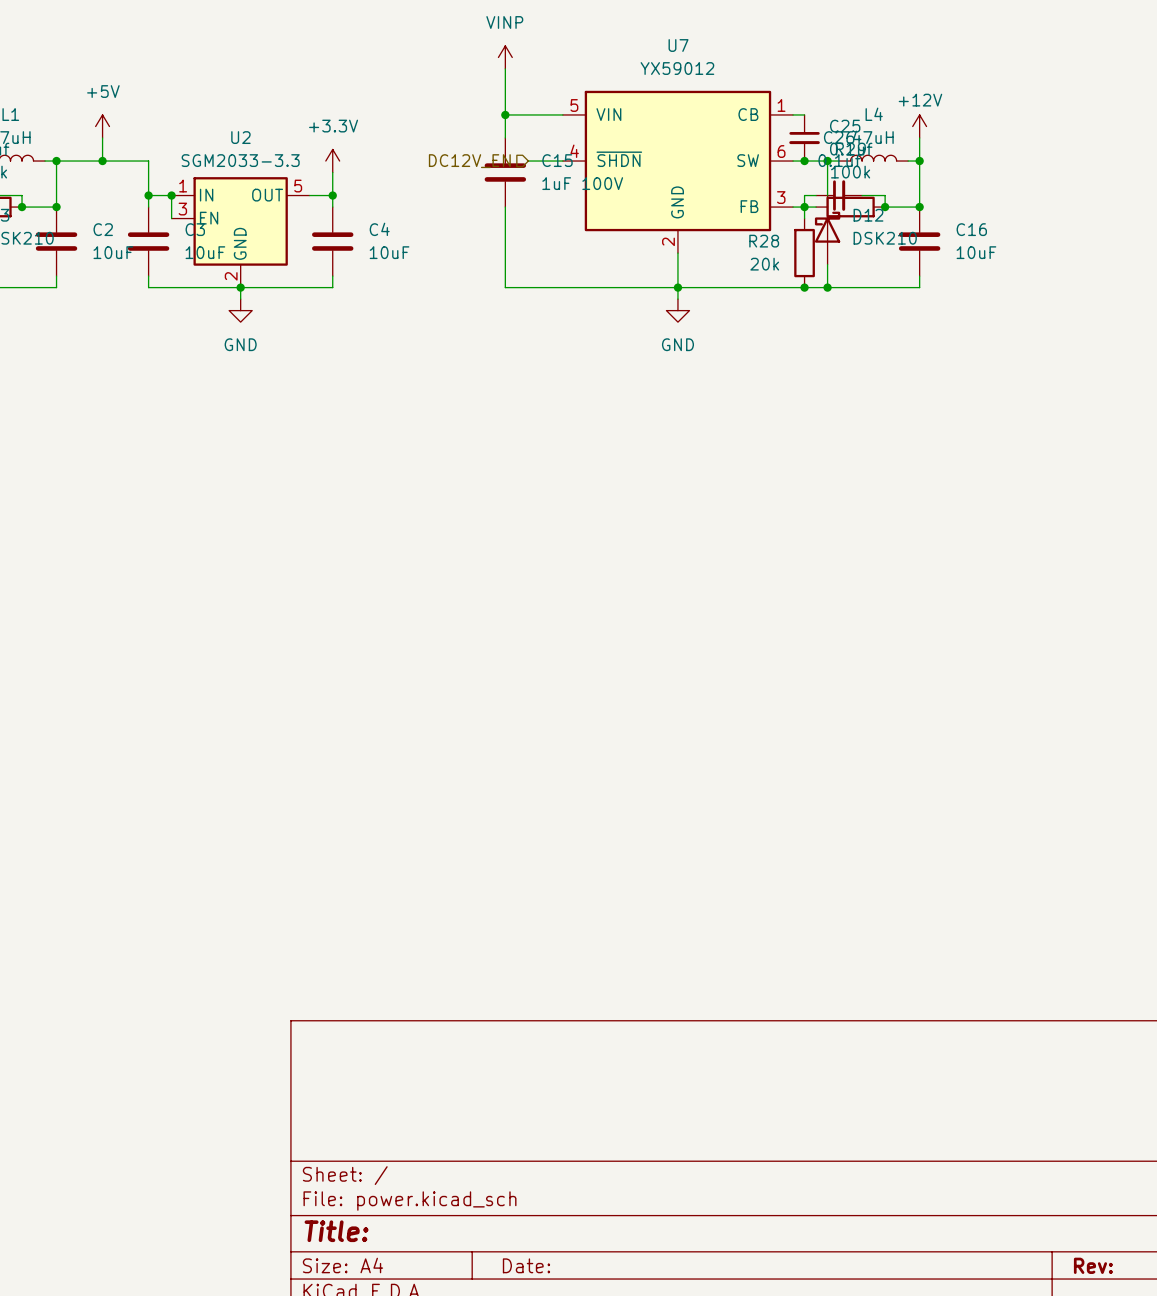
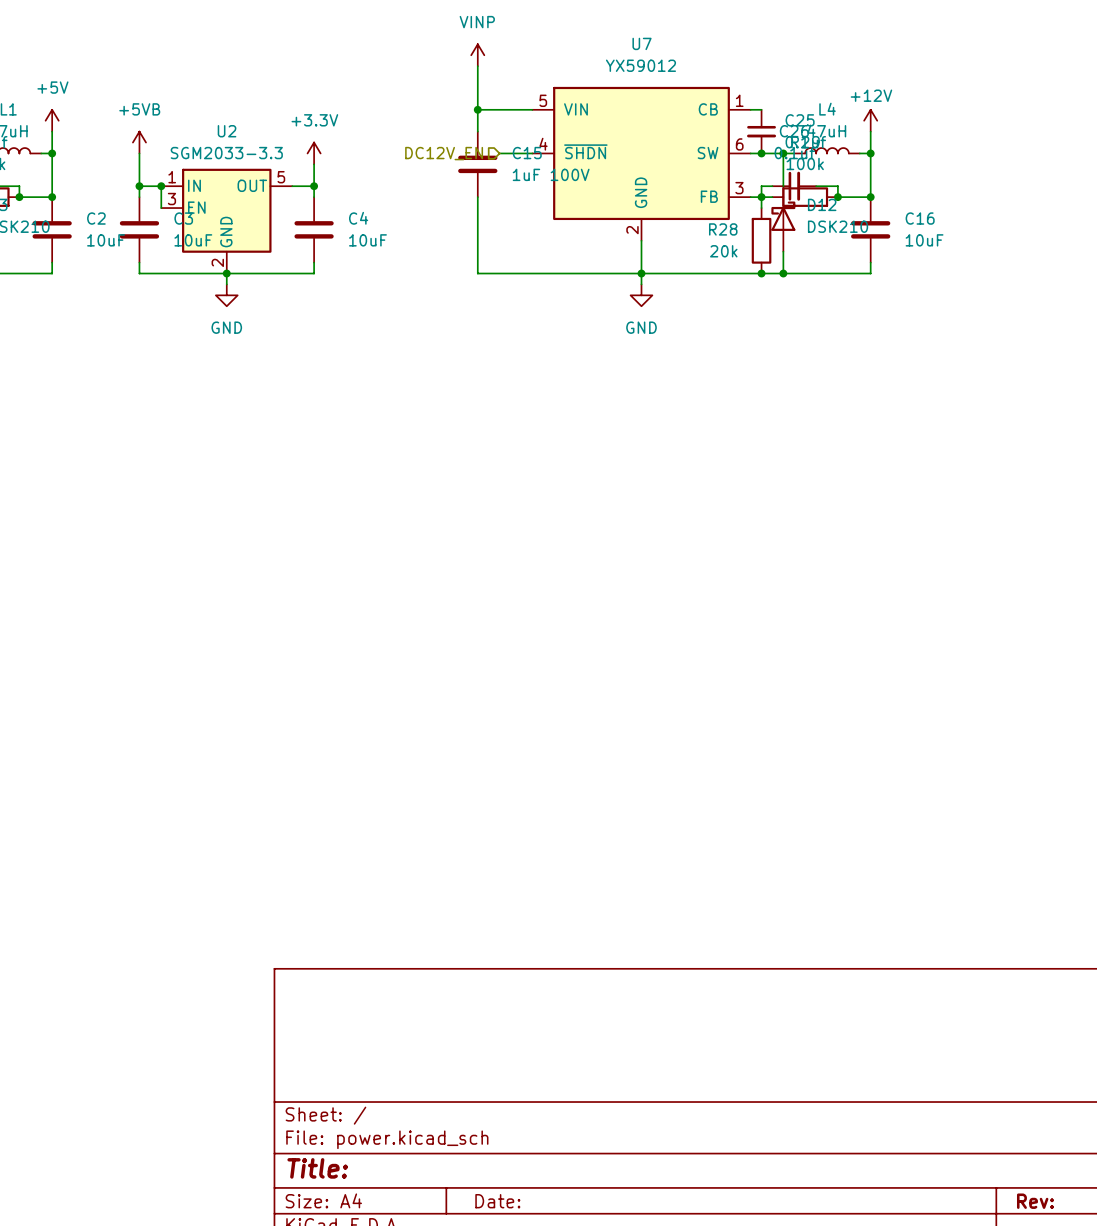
power symbol position: +5V (102, 126) -> +5V (52, 120)
wire: (102, 138) (102, 161) -> none
power symbol: none -> +5VB (139, 142)
wire: (56, 161) (148, 161) -> (52, 153) (52, 131)
junction: (102, 161) -> none

